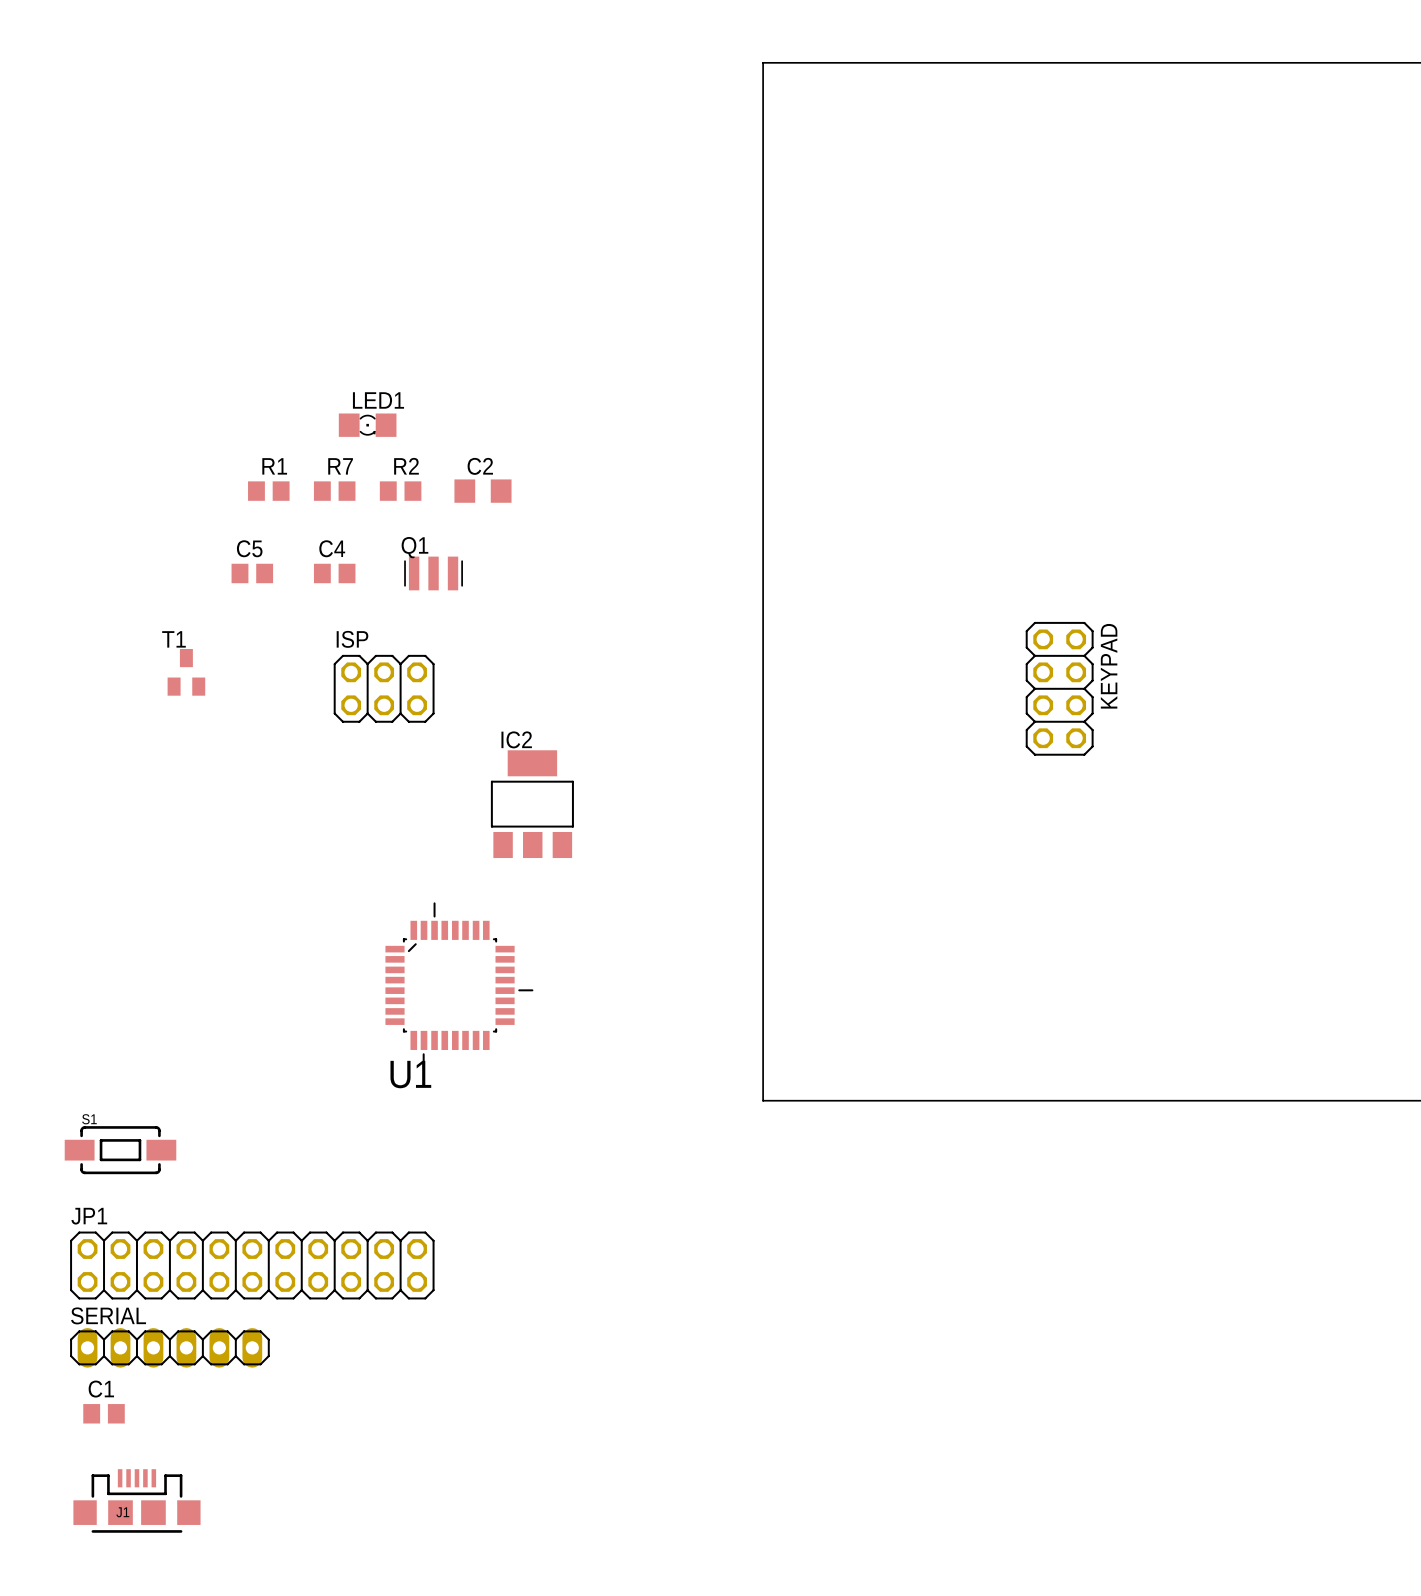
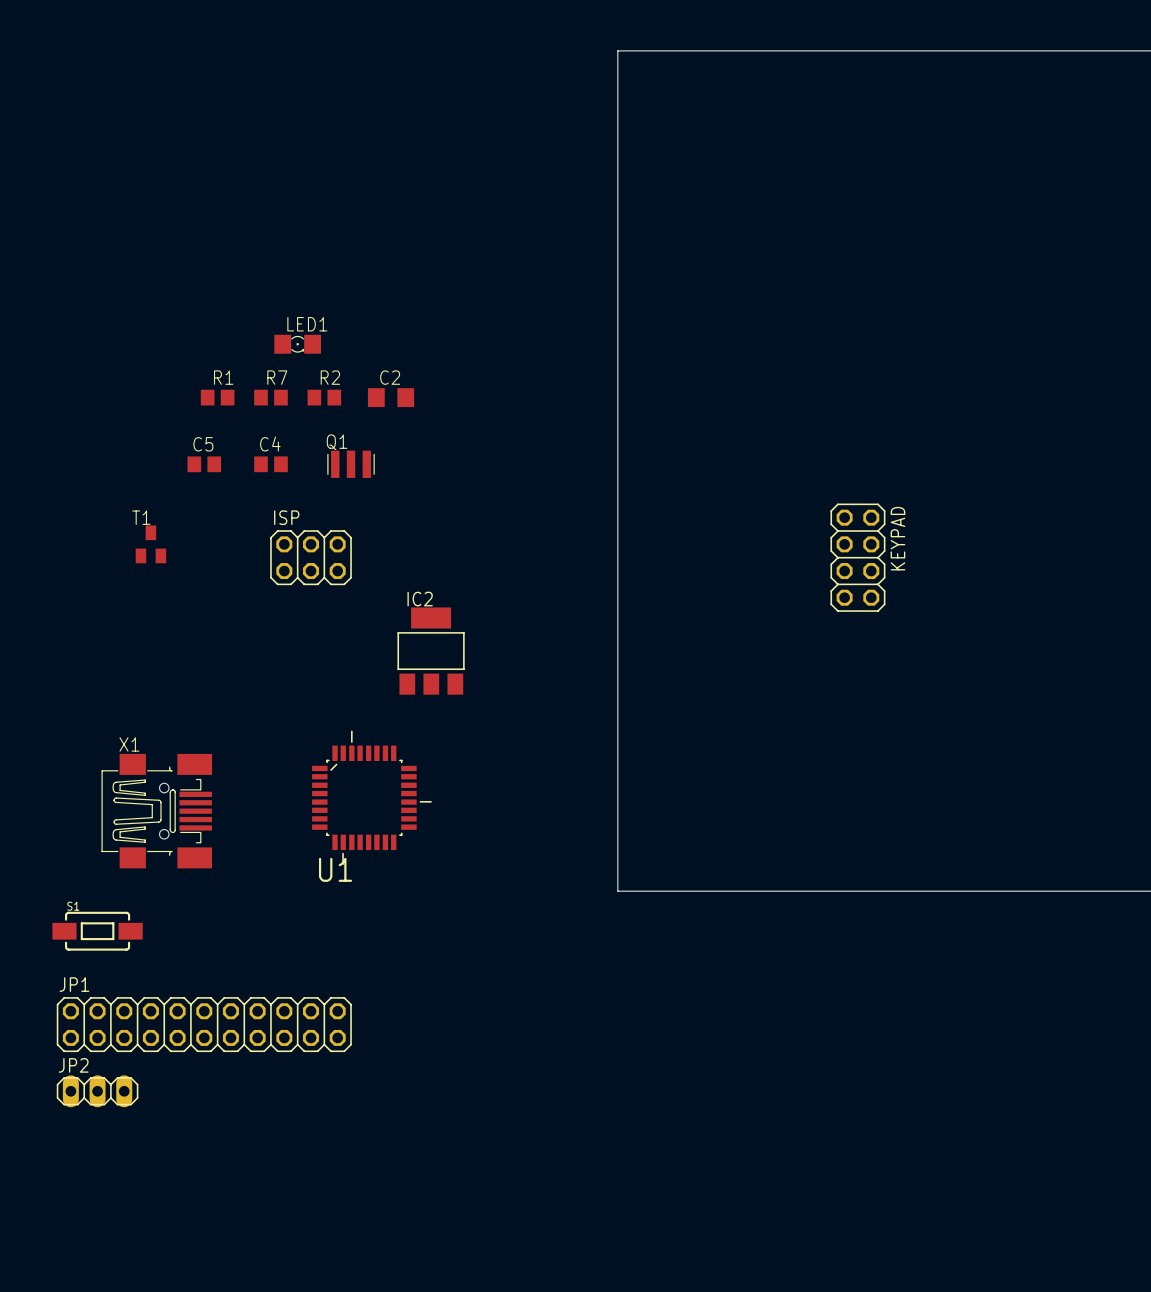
X1: none -> (156, 811)
JP2: none -> (97, 1091)
SERIAL: (169, 1347) -> none
C1: (104, 1413) -> none
J1: (136, 1500) -> none

